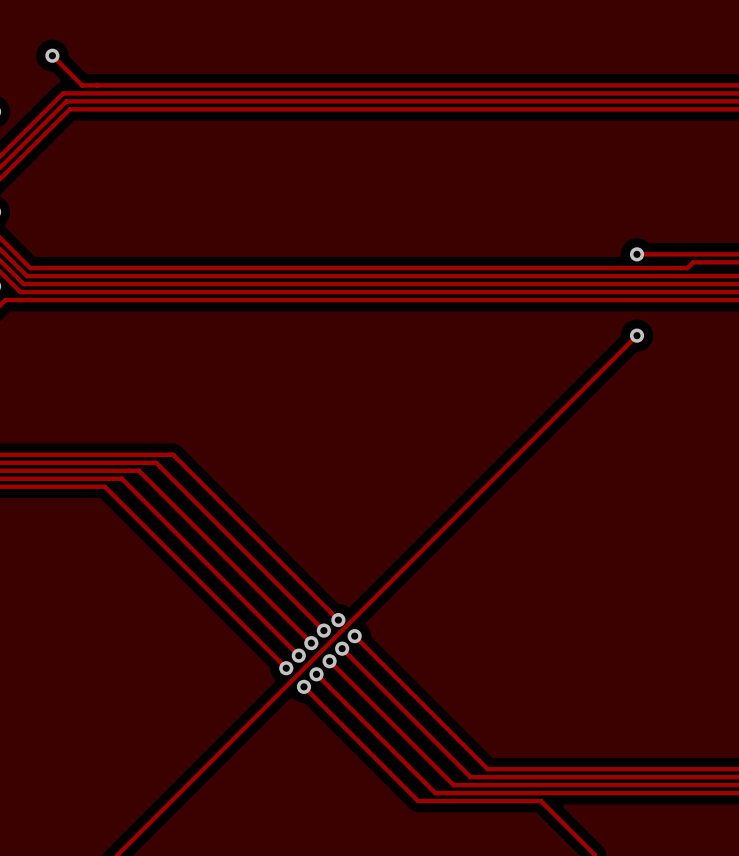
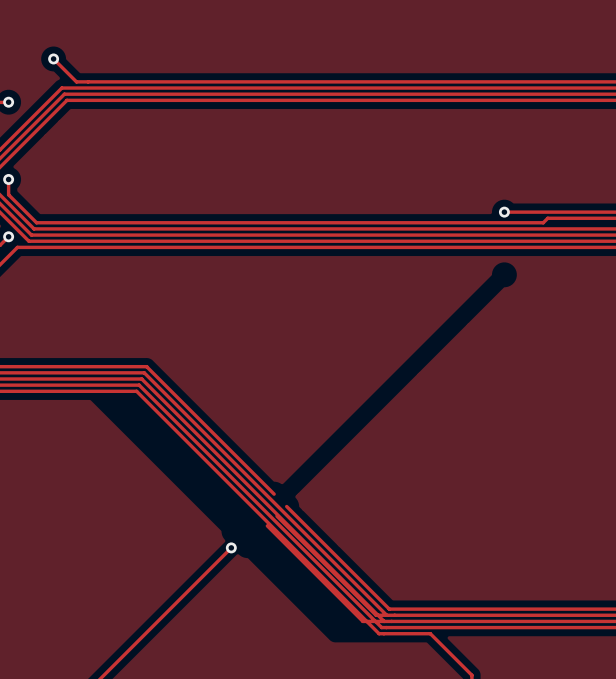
track: (637, 335) (282, 689) -> none
via: (637, 335) -> none
track: (156, 462) (323, 630) -> (133, 372) (144, 372) (386, 615)
track: (138, 470) (311, 643) -> (120, 378) (141, 378) (384, 621)
track: (121, 478) (298, 655) -> (107, 385) (139, 385) (381, 627)
track: (104, 486) (286, 668) -> (93, 391) (136, 391) (379, 633)
via: (338, 620) -> none
via: (323, 630) -> none
via: (354, 636) -> none
via: (311, 643) -> none
via: (342, 648) -> none
via: (298, 655) -> none
via: (329, 661) -> none
via: (286, 668) -> none
track: (316, 674) (435, 793) (477, 793) -> none
via: (316, 674) -> none
track: (303, 686) (418, 801) (474, 801) -> none
via: (303, 686) -> none
via: none -> (231, 547)

